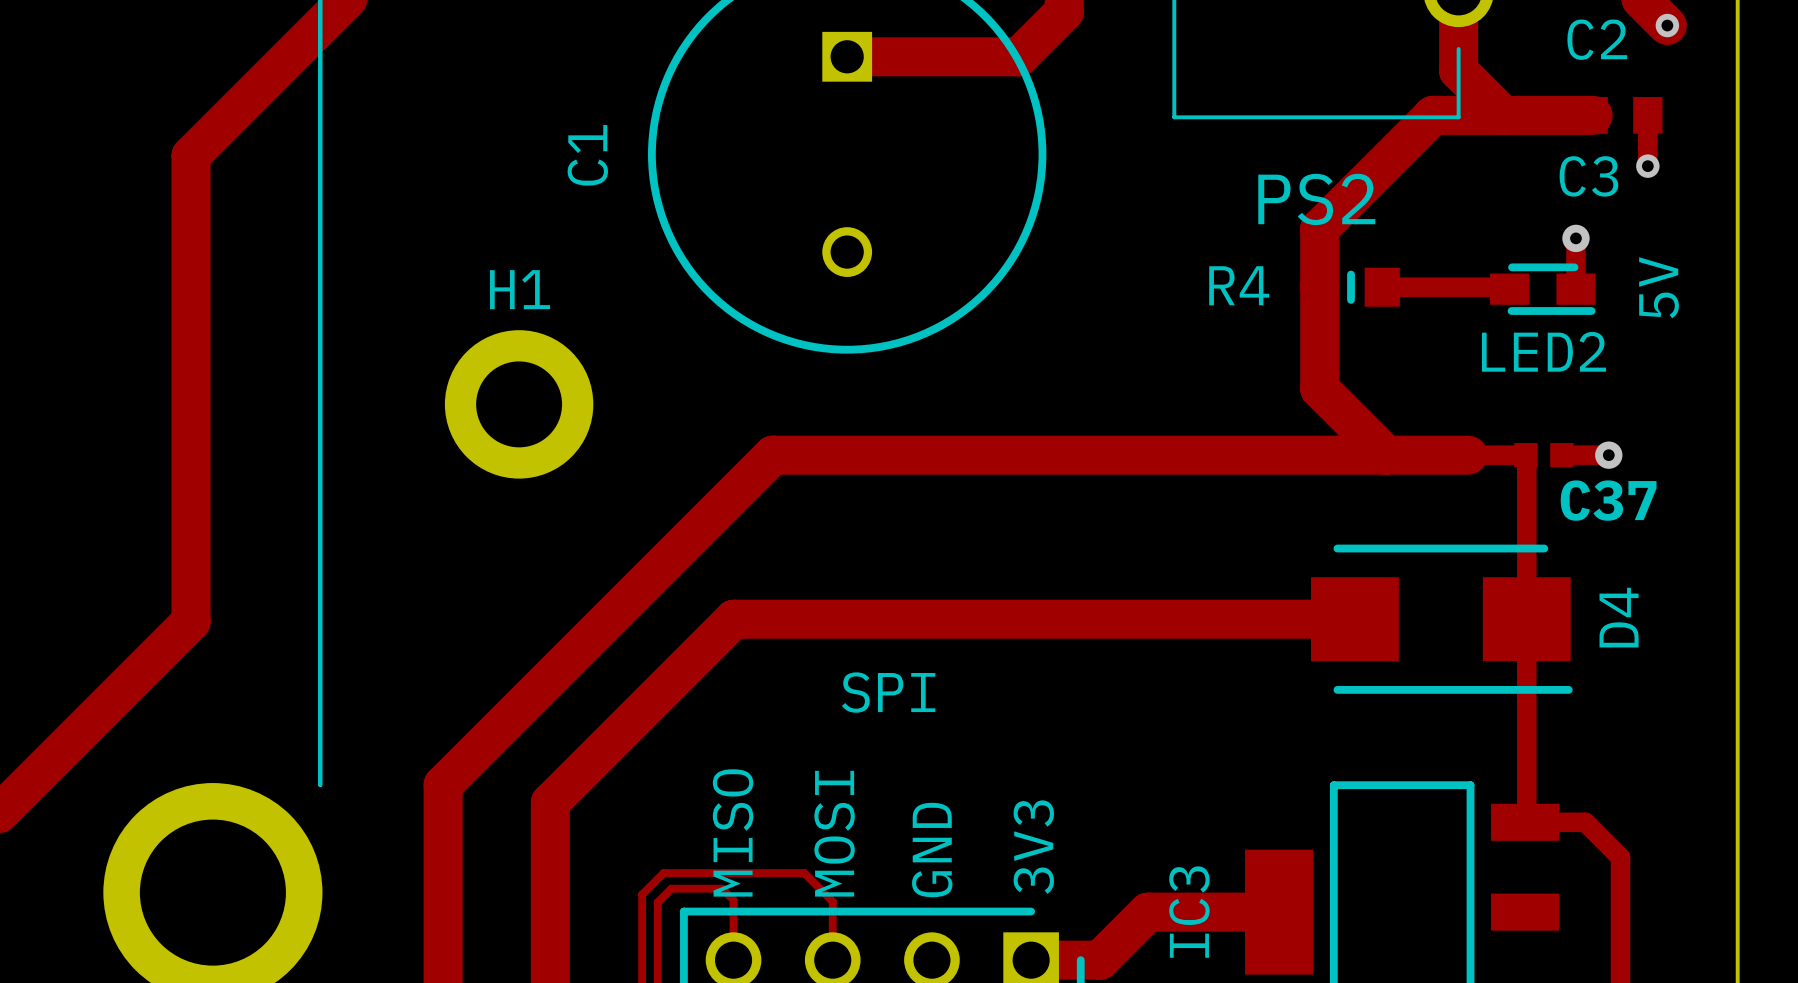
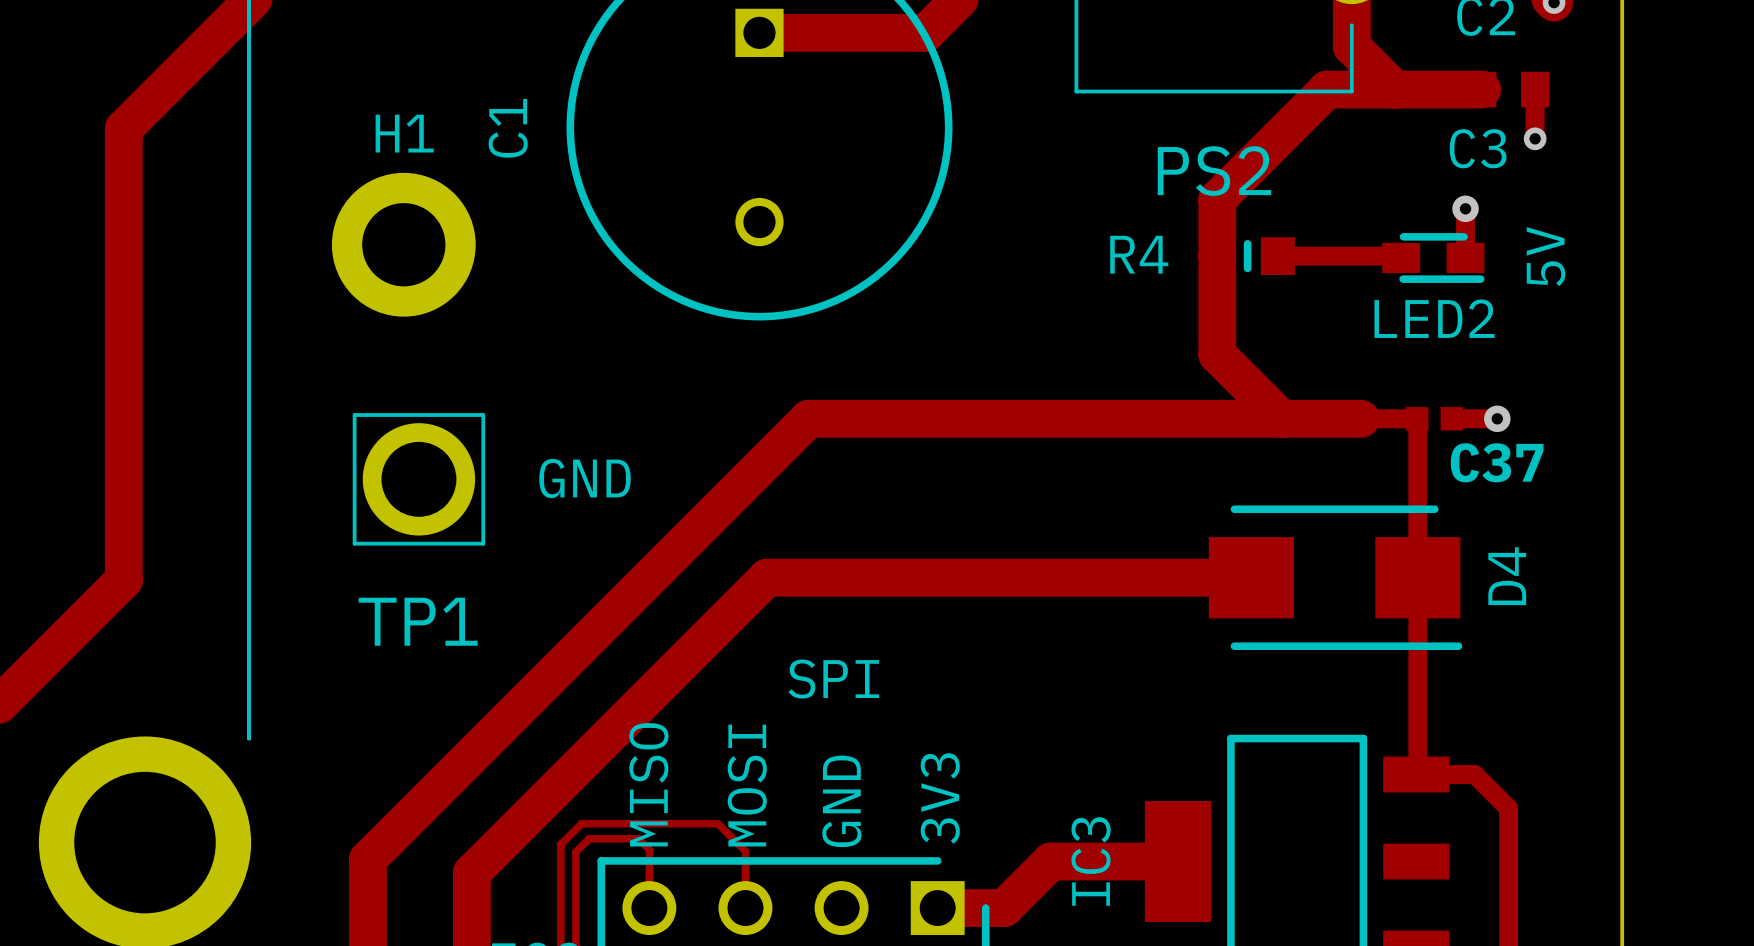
H1 position: (519, 404) -> (403, 244)
top track: (897, 455) (772, 455) (443, 784) (443, 909) -> none
text: none -> GND (585, 478)
TP1: none -> (418, 479)
top track: (733, 619) (855, 619) -> (649, 577) (808, 418)
top track: none -> (767, 577) (471, 872)
text position: SPI (888, 692) -> SPI (833, 679)
top track: (550, 802) (550, 923) -> (471, 755) (368, 859)

